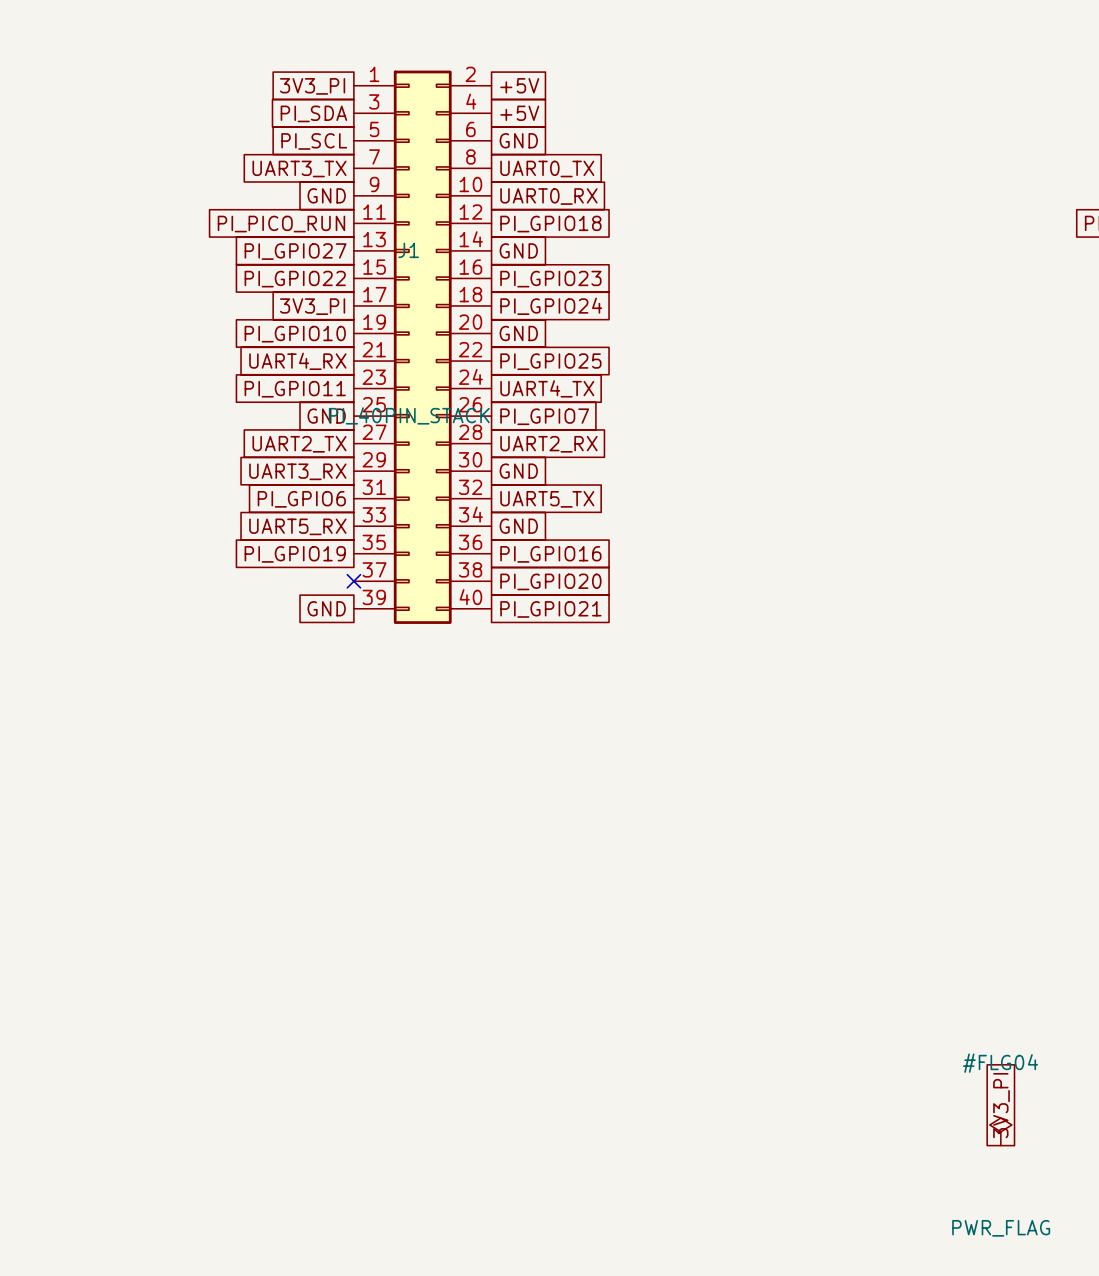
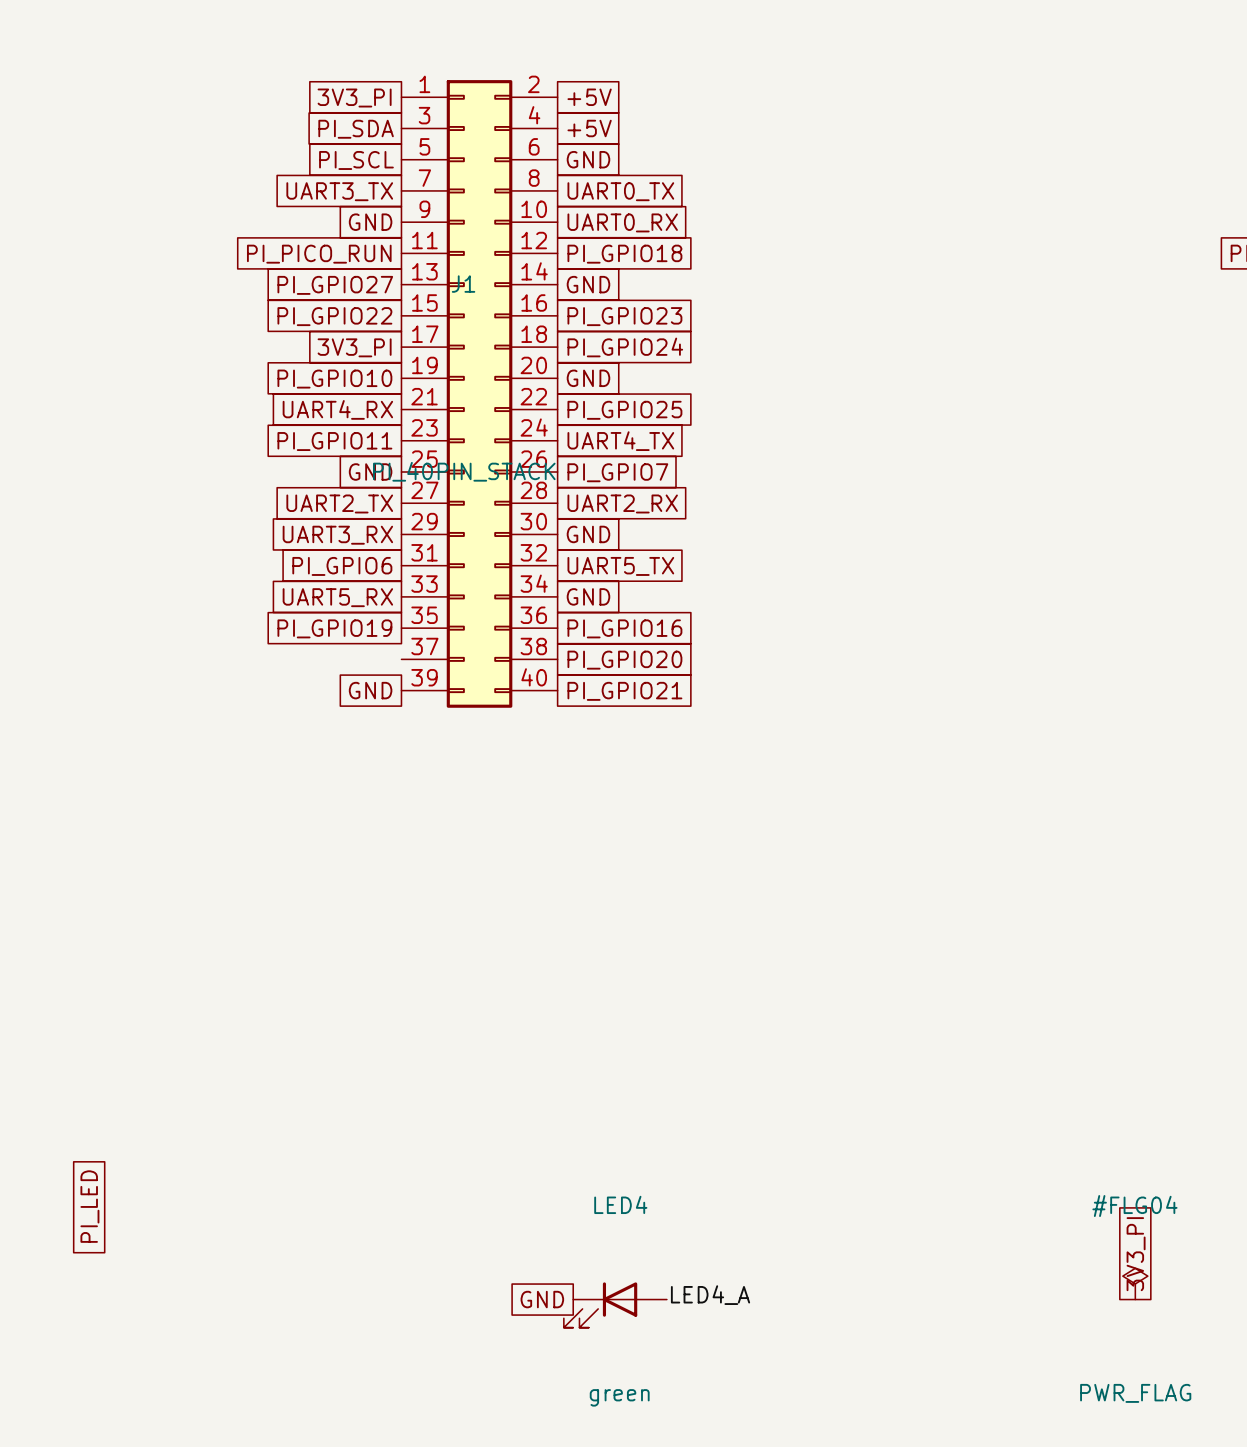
no-connect mark: (353, 581) -> none
global label: none -> PI_LED (89, 1206)
label: none -> LED4_A (710, 1295)
global label: none -> GND (542, 1299)
LED4: none -> green (615, 1305)

